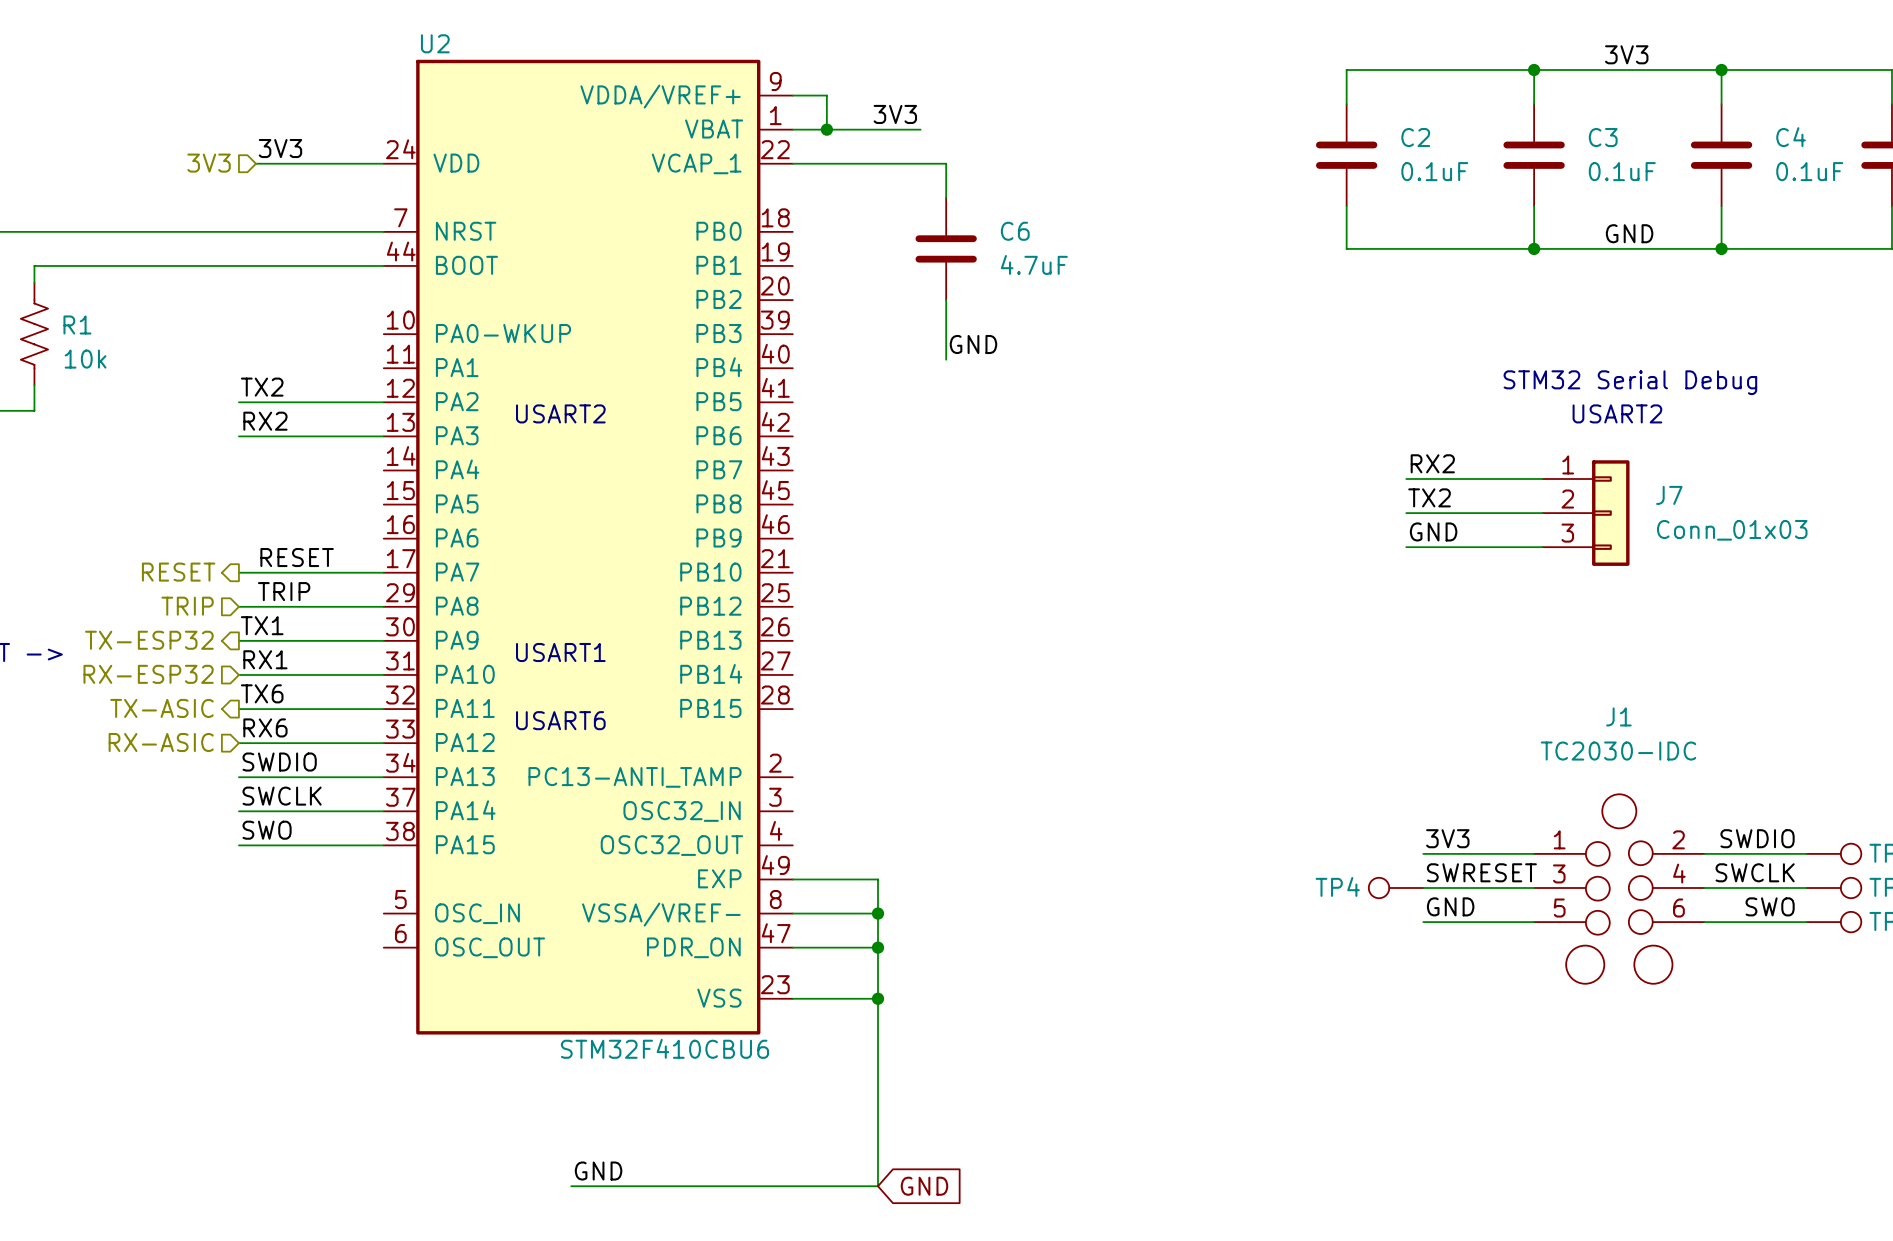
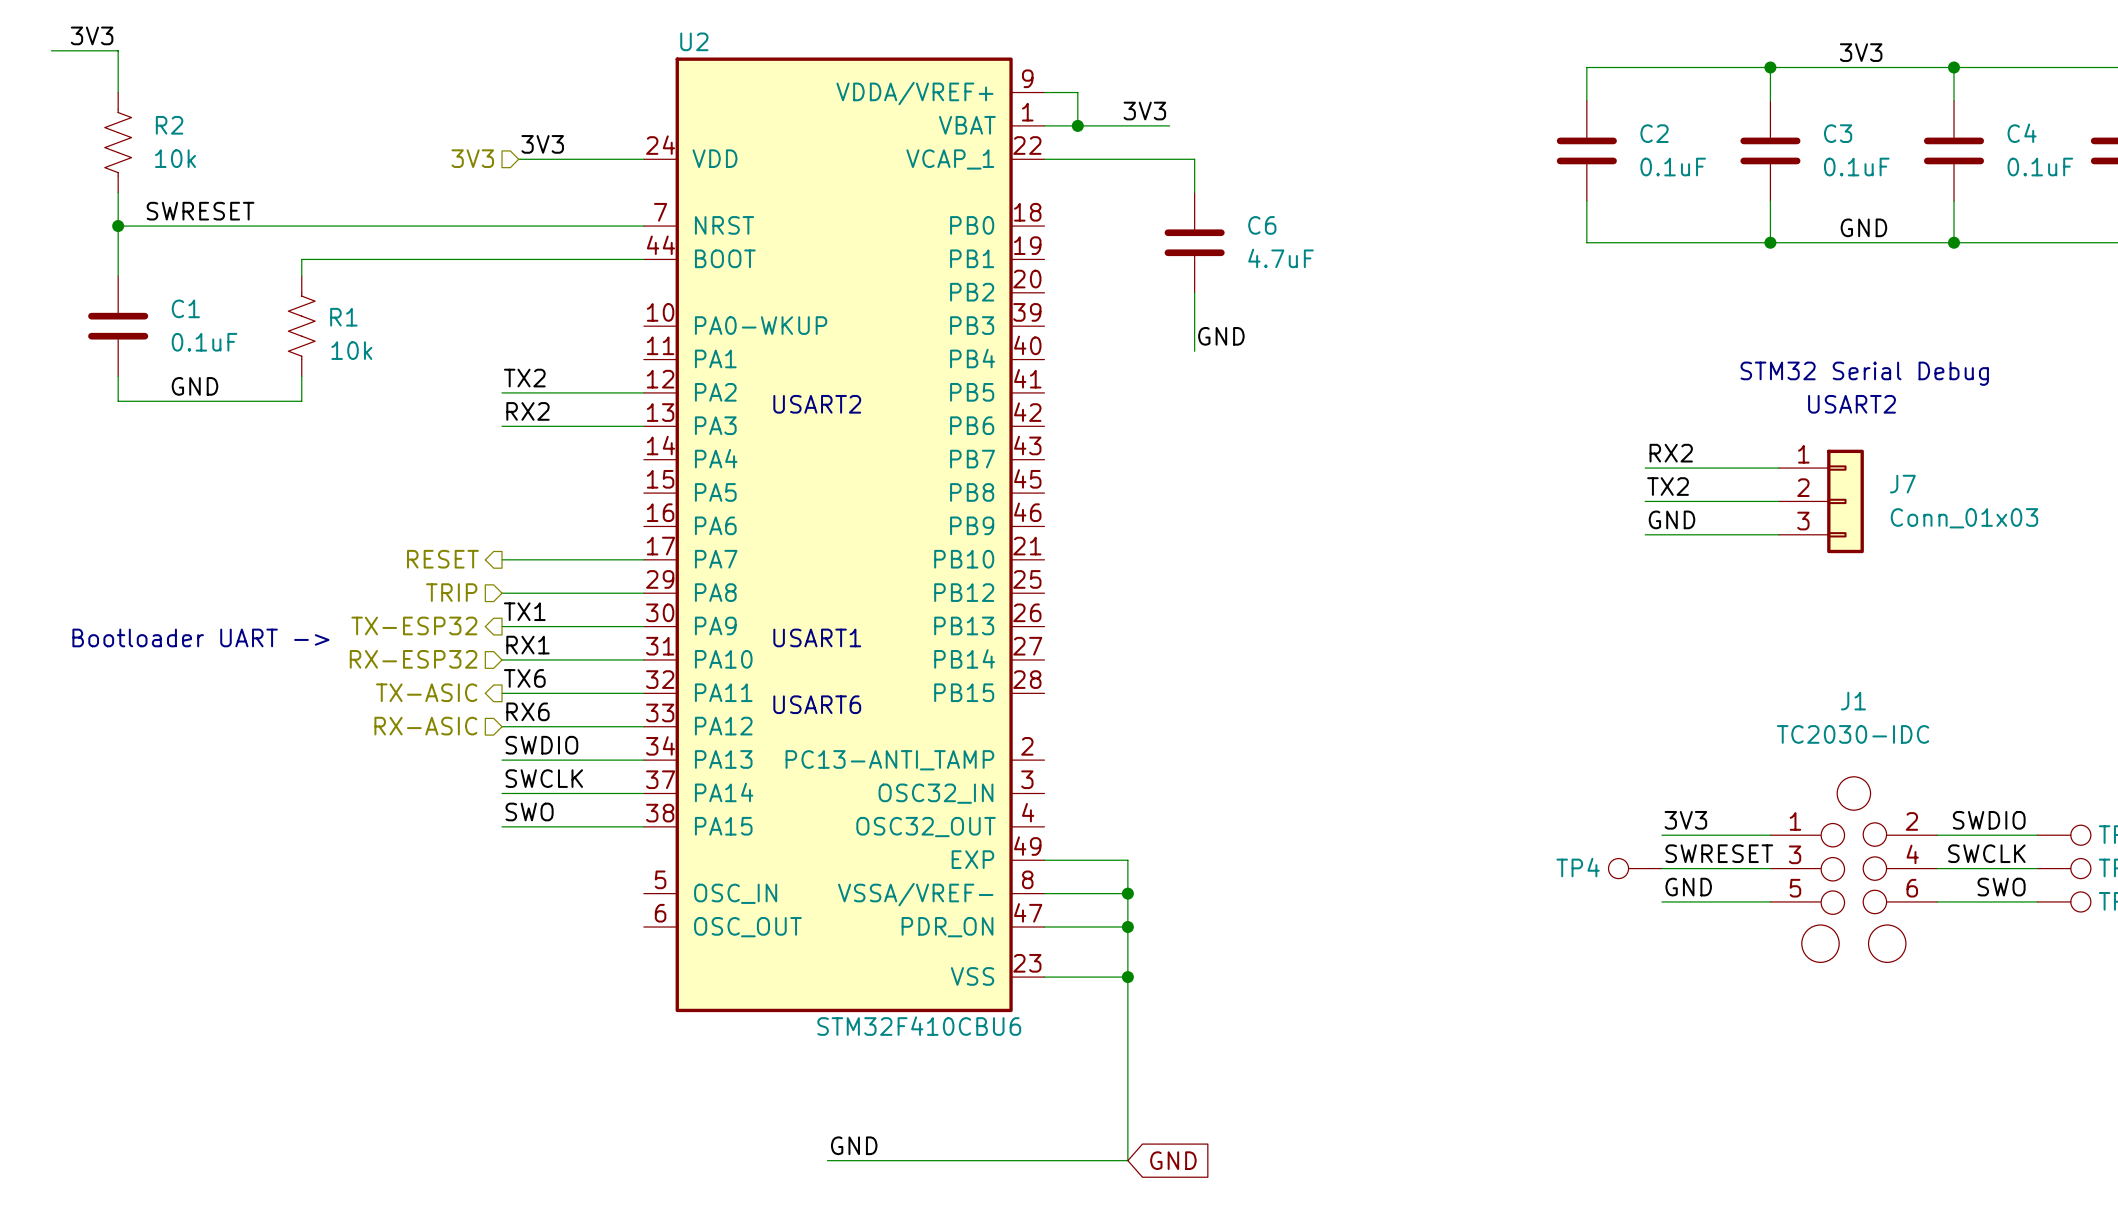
label: RESET (297, 557) -> none
label: TRIP (284, 591) -> none

